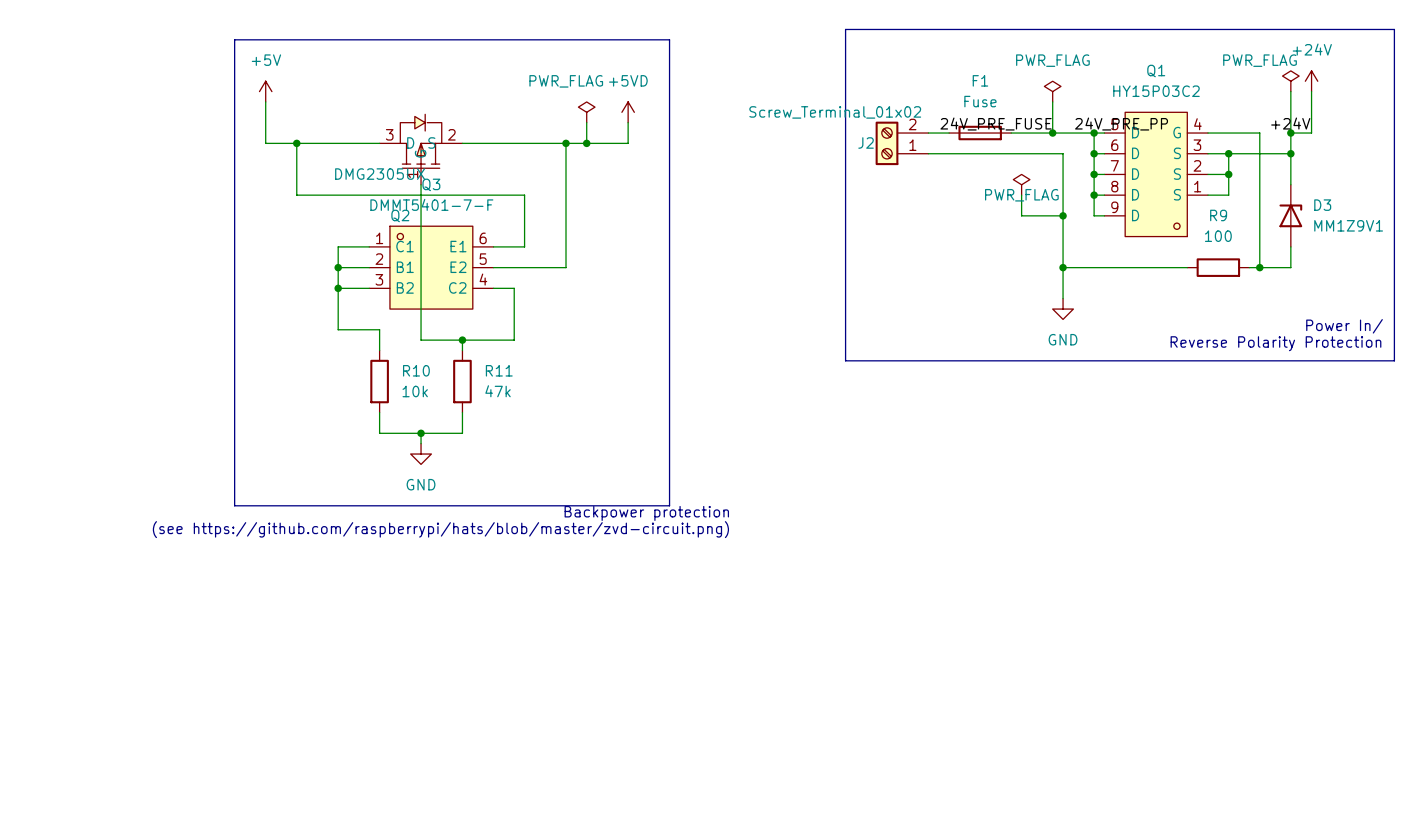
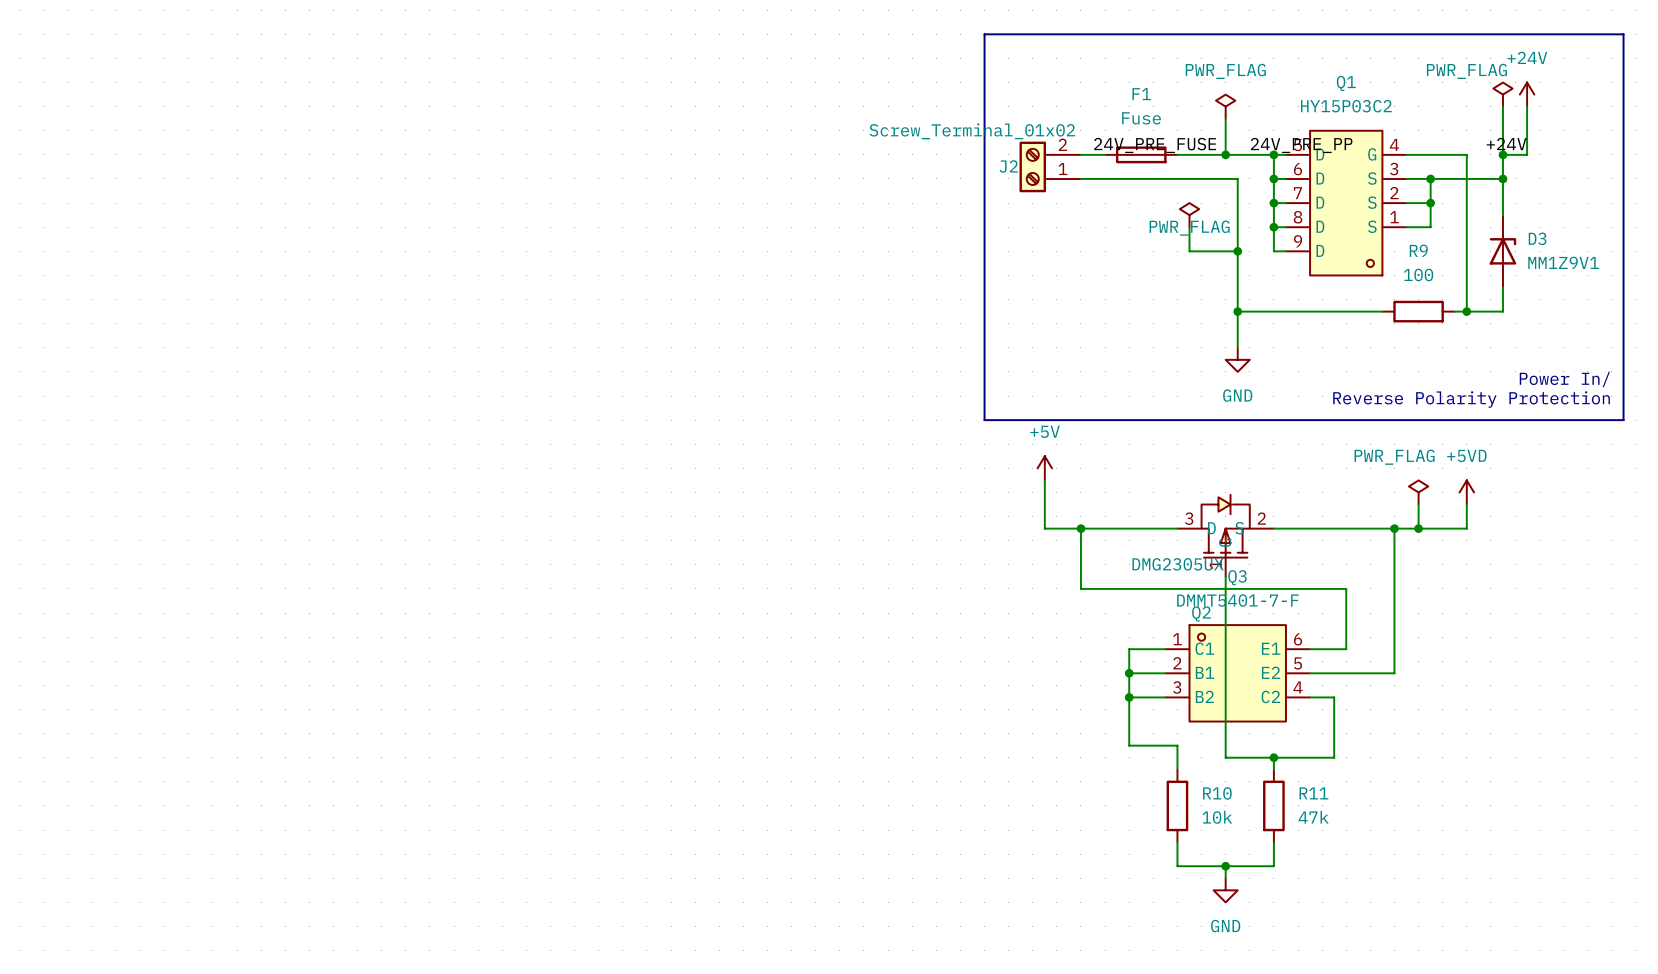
line: (234, 39) (669, 39) (669, 505) (234, 505) (234, 39) -> none
power symbol: +5V (265, 91) -> none
wire: (265, 101) (265, 143) (379, 143) -> none
power symbol: PWR_FLAG (586, 112) -> none
power symbol: +5VD (628, 112) -> none
wire: (586, 122) (586, 143) -> none
wire: (628, 122) (628, 143) (462, 143) -> none
wire: (296, 143) (296, 195) (524, 195) (524, 246) (493, 246) -> none
junction: (296, 143) -> none
wire: (566, 143) (566, 267) (493, 267) -> none
junction: (566, 143) -> none
junction: (586, 143) -> none
Q2 position: (421, 149) -> (1225, 535)
wire: (421, 184) (421, 340) (514, 340) (514, 288) (493, 288) -> none
wire: (369, 246) (338, 246) (338, 329) (379, 329) (379, 350) -> none
wire: (338, 267) (369, 267) -> none
junction: (338, 267) -> none
Q3 position: (431, 267) -> (1237, 673)
wire: (338, 288) (369, 288) -> none
junction: (338, 288) -> none
wire: (462, 340) (462, 350) -> none
junction: (462, 340) -> none
R10 position: (379, 381) -> (1177, 805)
R11 position: (462, 381) -> (1273, 805)
power symbol: none -> +5V (1044, 468)
wire: (379, 412) (379, 433) (462, 433) (462, 412) -> none
wire: none -> (1044, 480) (1044, 528) (1177, 528)
power symbol: none -> PWR_FLAG (1418, 492)
power symbol: none -> +5VD (1466, 492)
wire: (421, 433) (421, 443) -> none
junction: (421, 433) -> none
wire: none -> (1418, 504) (1418, 528)
wire: none -> (1466, 504) (1466, 528) (1273, 528)
power symbol: GND (421, 454) -> none
wire: none -> (1080, 528) (1080, 588) (1346, 588) (1346, 649) (1310, 649)
junction: none -> (1080, 528)
wire: none -> (1394, 528) (1394, 673) (1310, 673)
junction: none -> (1394, 528)
junction: none -> (1418, 528)
wire: none -> (1225, 576) (1225, 757) (1334, 757) (1334, 697) (1310, 697)
text: Backpower protection (646, 513) -> none
text: (see https://github.com/raspberrypi/hats/blob/master/zvd-circuit.png) (440, 529) -> none
wire: none -> (1165, 649) (1129, 649) (1129, 745) (1177, 745) (1177, 769)
wire: none -> (1129, 673) (1165, 673)
junction: none -> (1129, 673)
wire: none -> (1129, 697) (1165, 697)
junction: none -> (1129, 697)
wire: none -> (1273, 757) (1273, 769)
junction: none -> (1273, 757)
wire: none -> (1177, 842) (1177, 866) (1273, 866) (1273, 842)
wire: none -> (1225, 866) (1225, 878)
junction: none -> (1225, 866)
power symbol: none -> GND (1225, 890)

